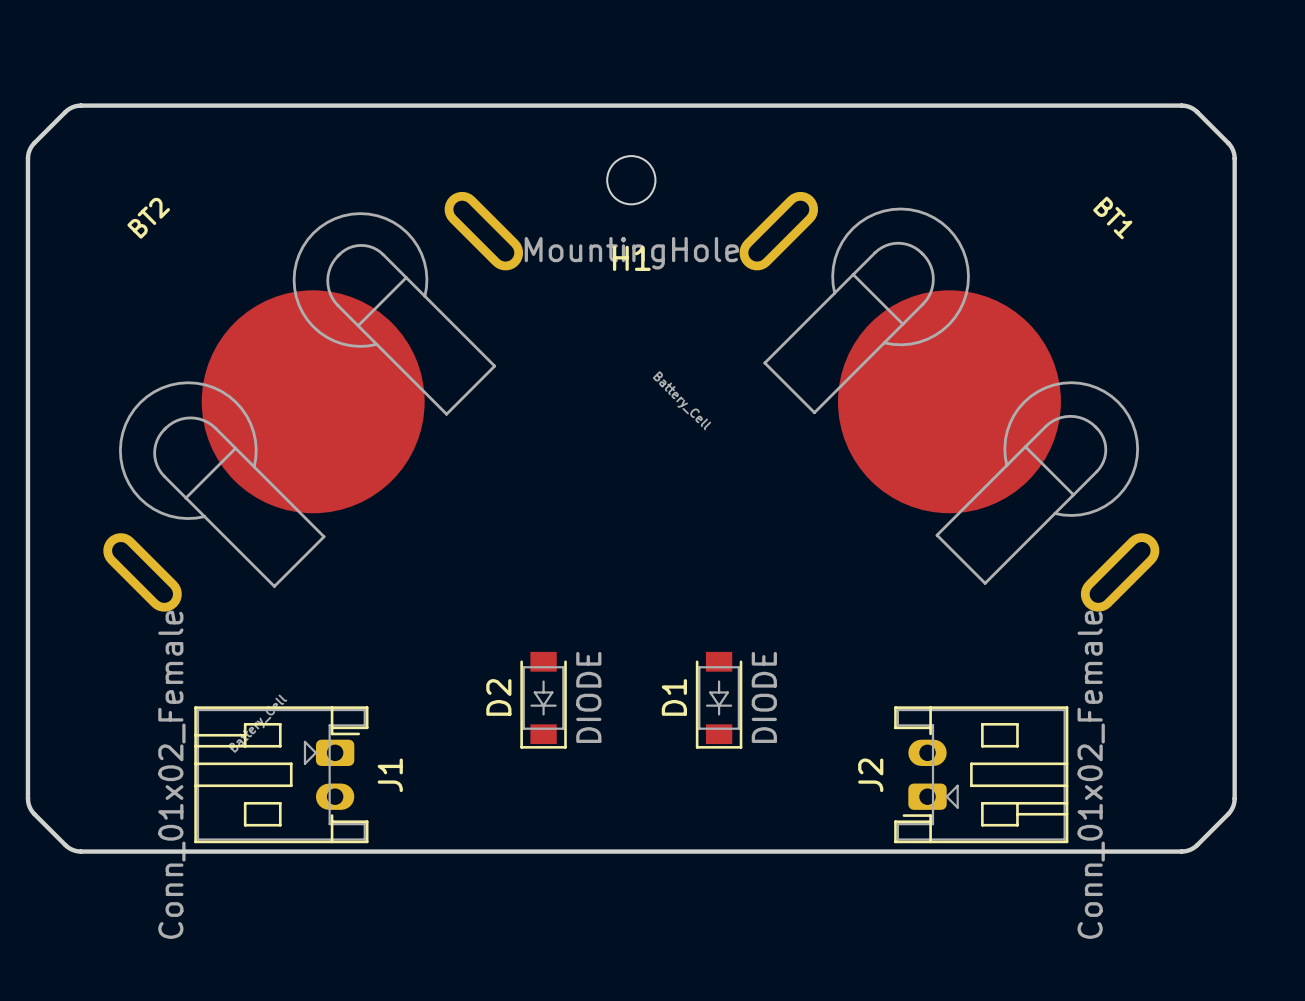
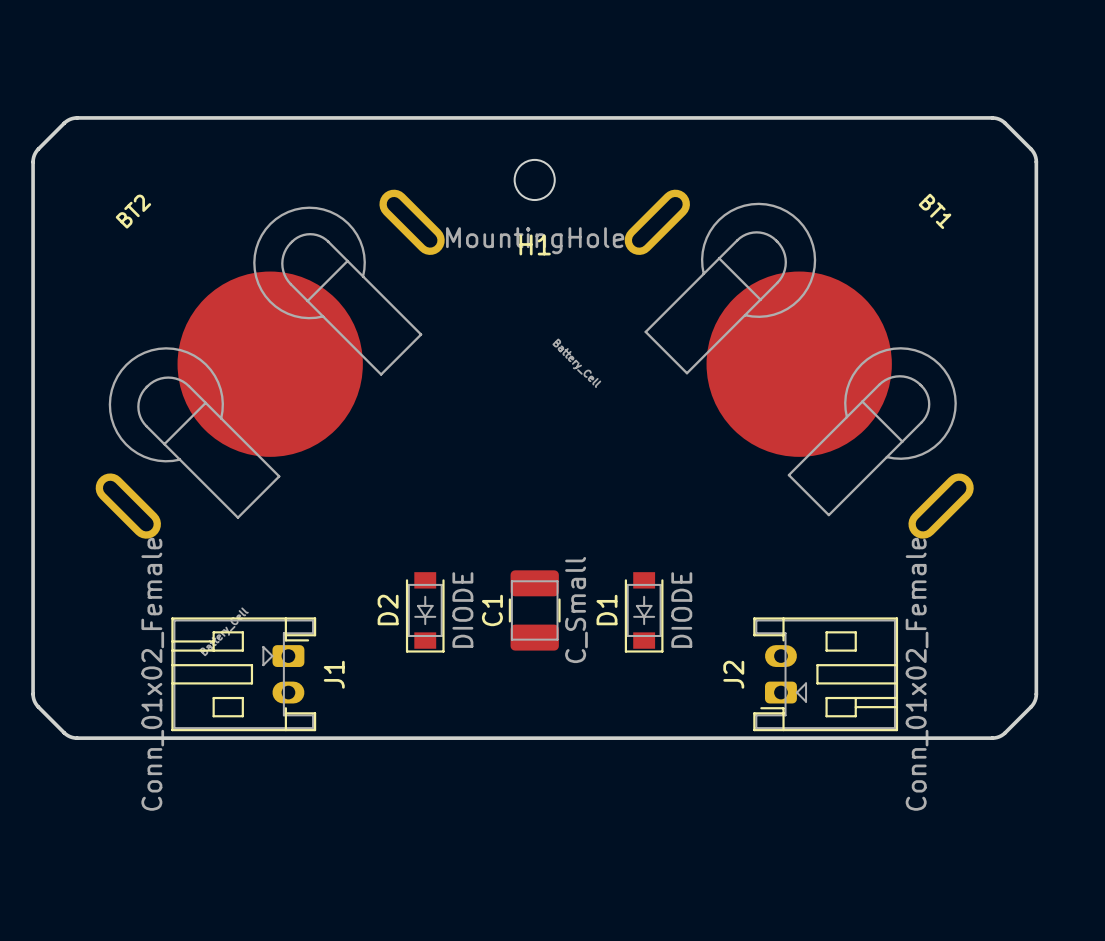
C1: none -> C_Small (534, 610)
D2 position: (543, 700) -> (425, 612)
D1 position: (719, 700) -> (644, 612)

